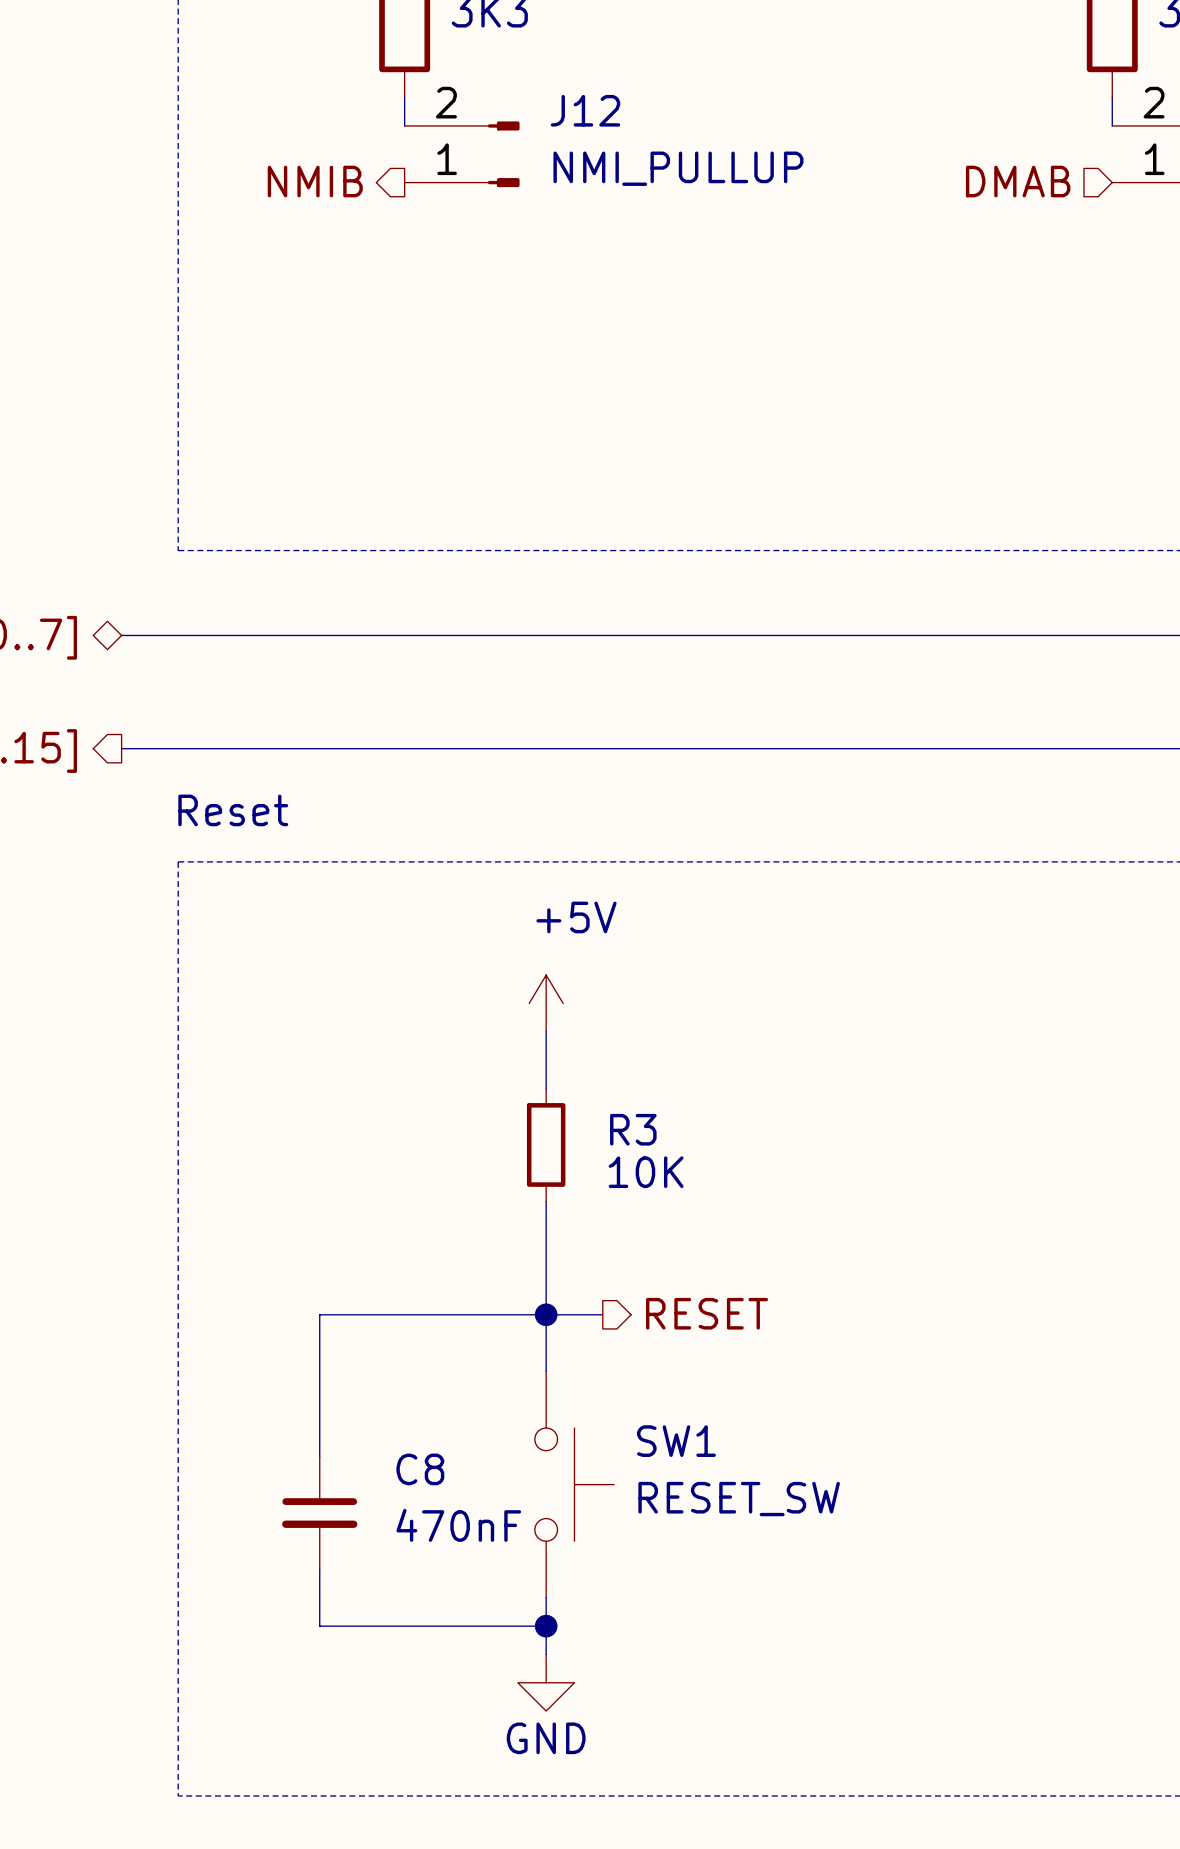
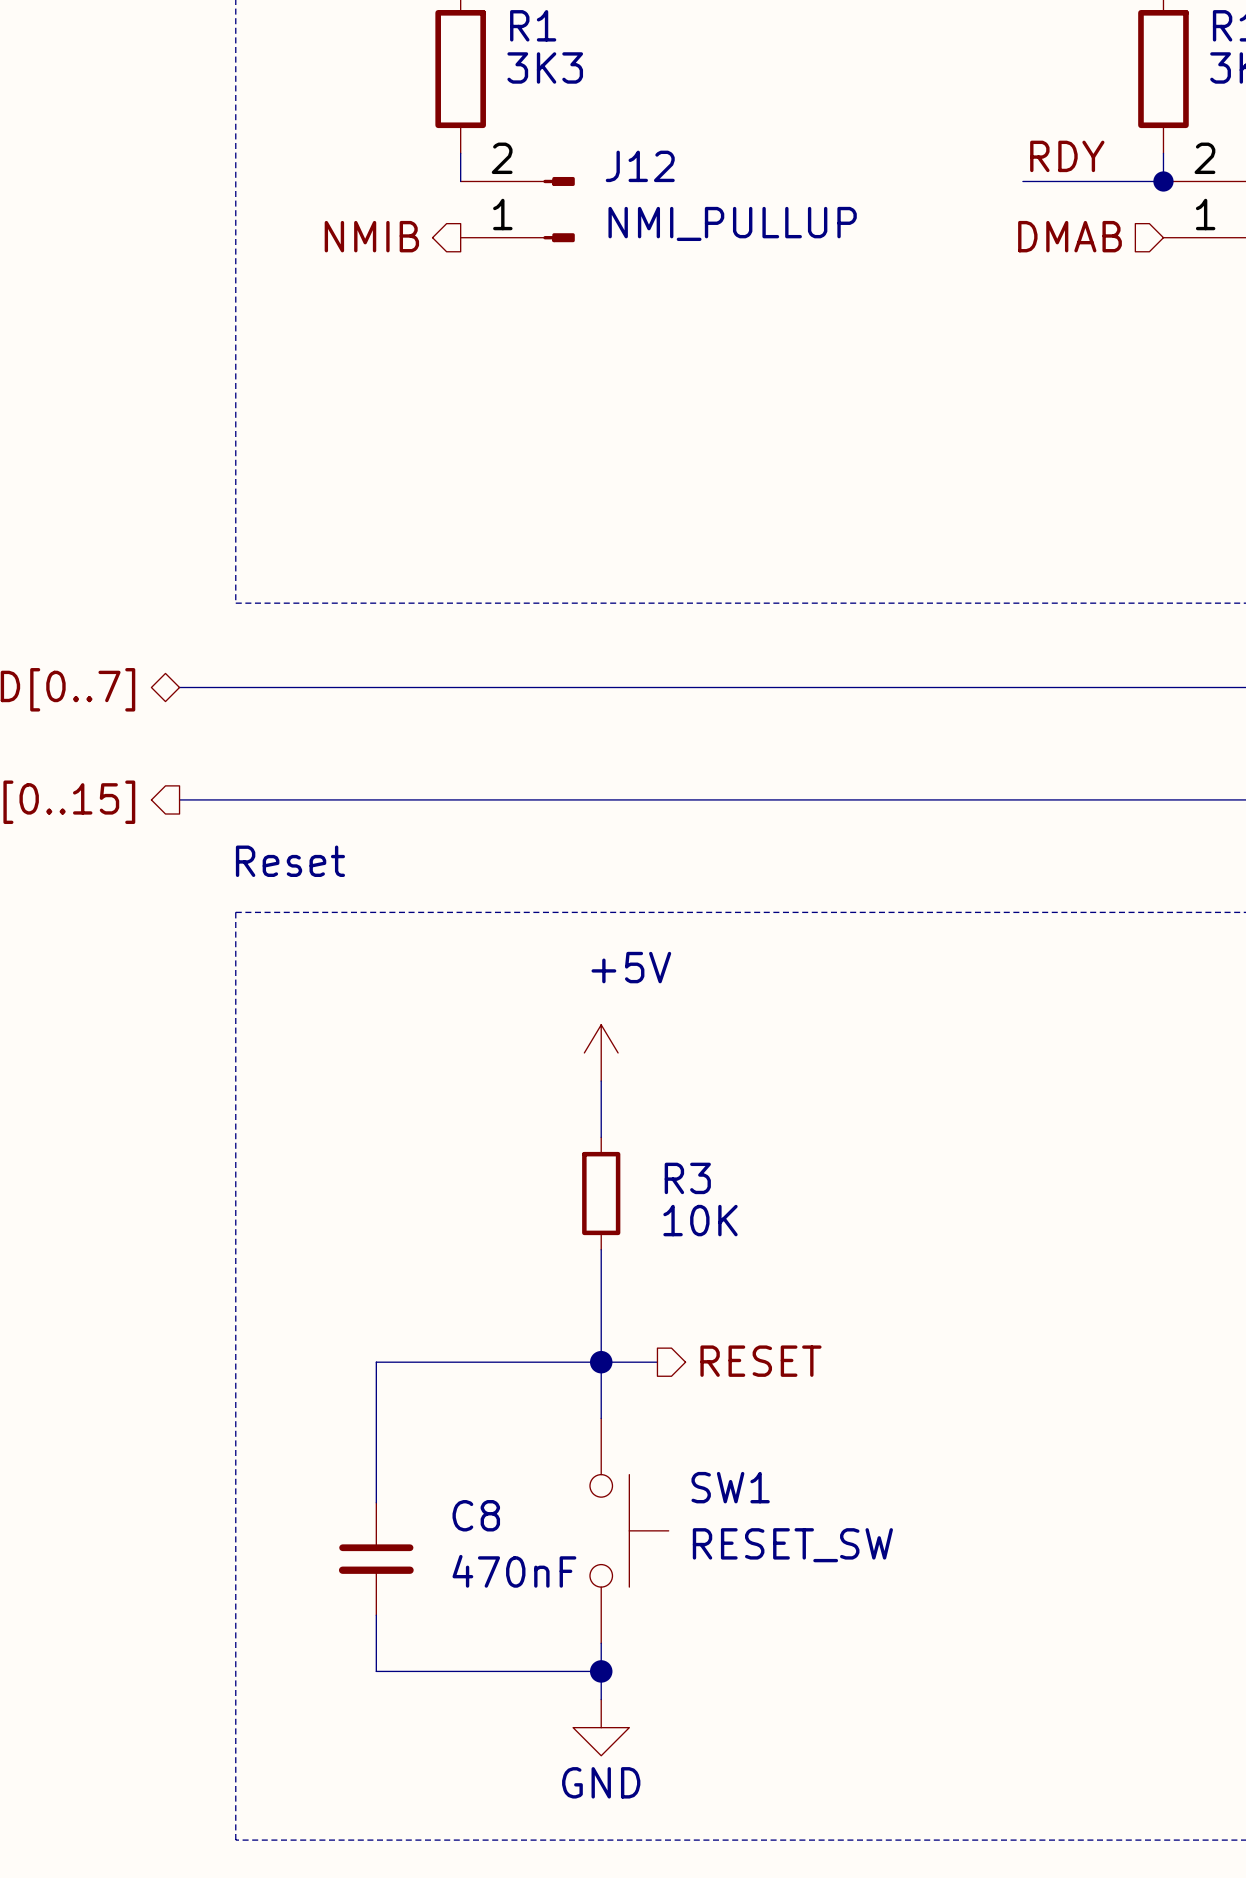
label: none -> RDY (1067, 156)
wire: none -> (1022, 181) (1163, 181)
junction: none -> (1163, 181)

